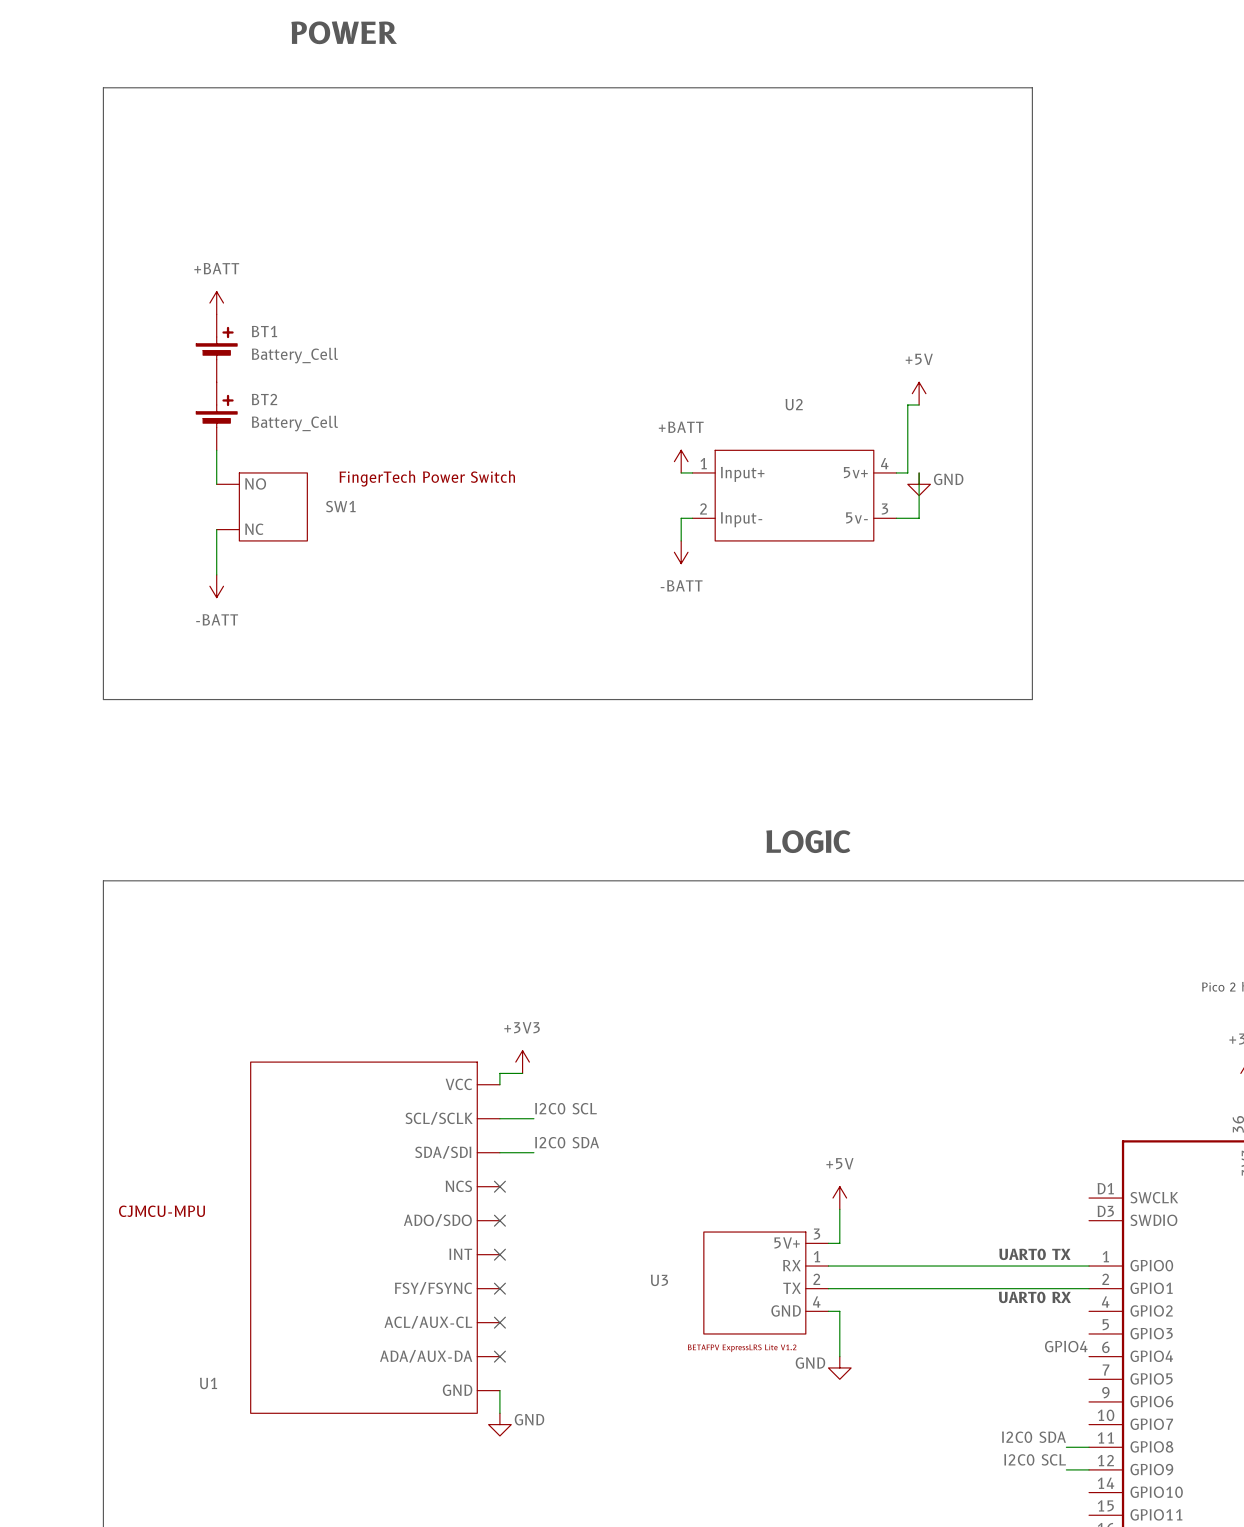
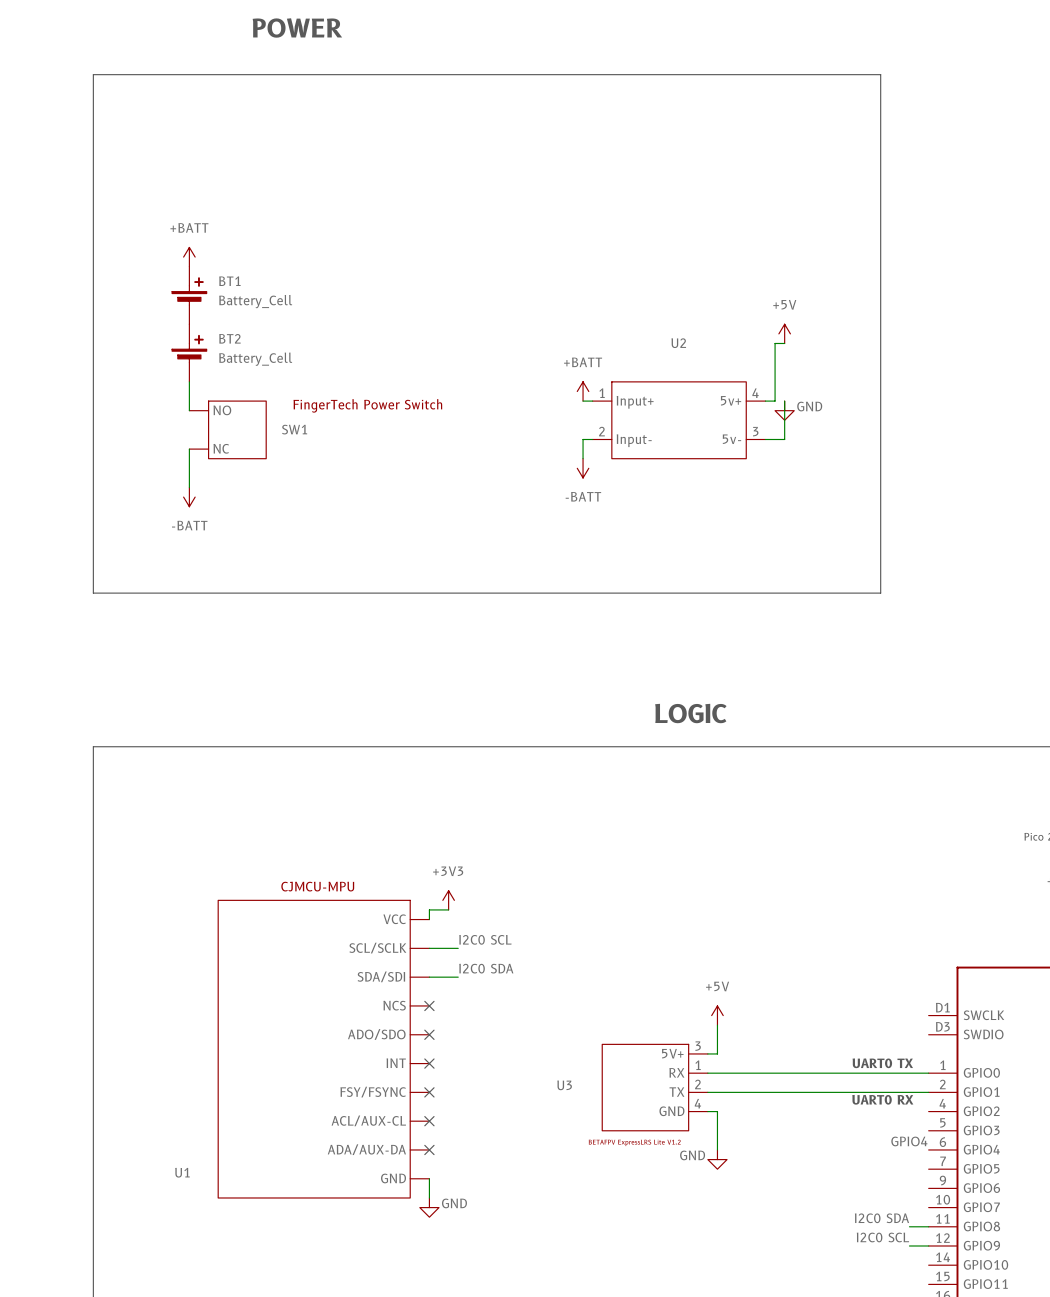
U1 text position: CJMCU-MPU (161, 1211) -> CJMCU-MPU (317, 886)

